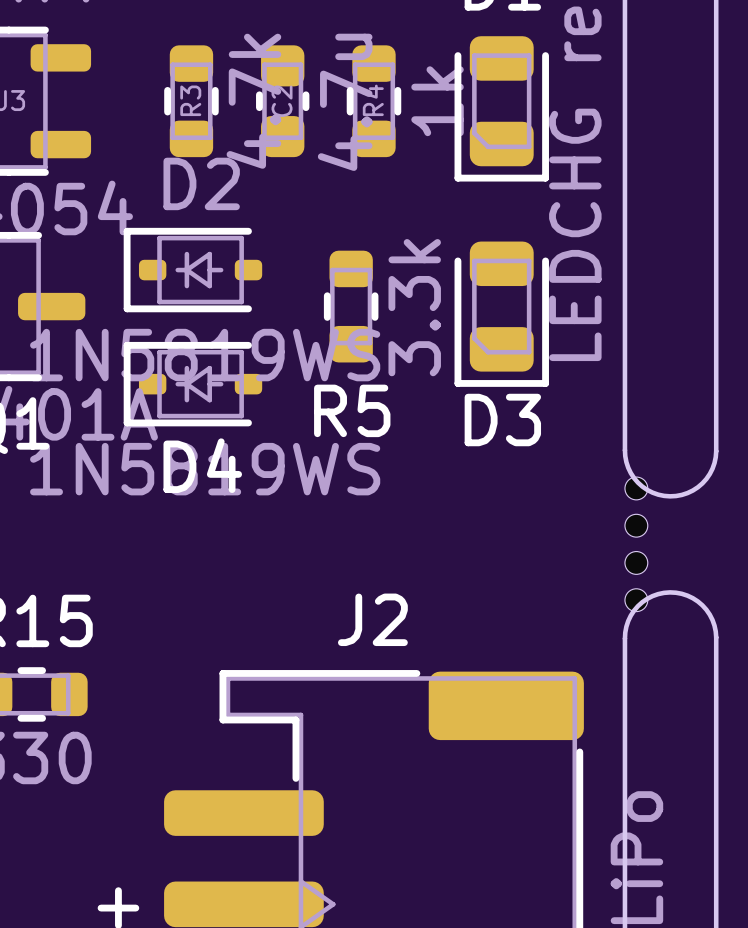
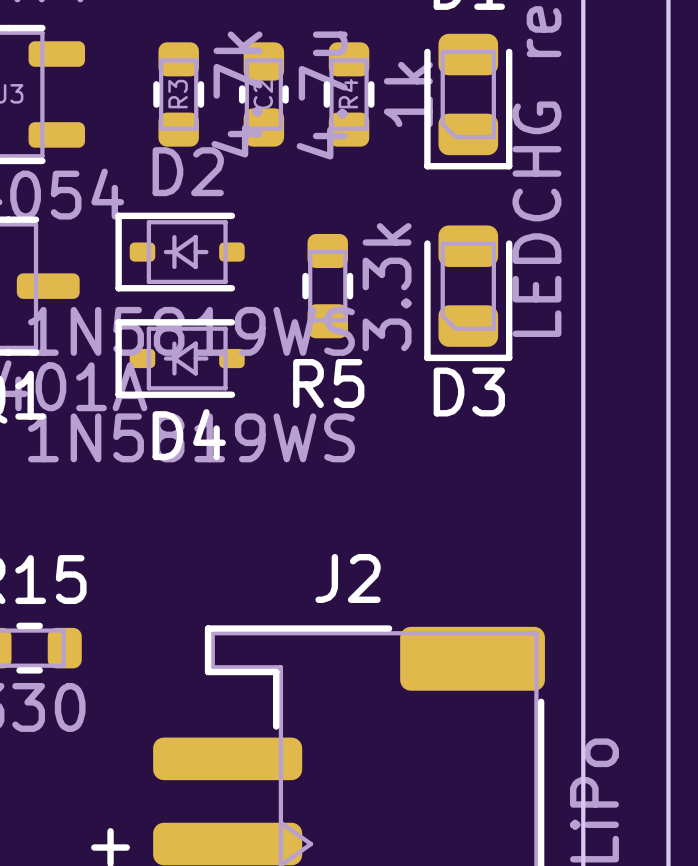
board edge: (624, 450) (628, 467) (637, 482) (652, 492) (670, 496) (687, 493) (702, 483) (712, 468) (716, 451) -> (668, 594) (668, 421)
part: (636, 488) -> none
part: (636, 525) -> none
part: (636, 562) -> none
part: (636, 600) -> none
board edge: (716, 637) (712, 620) (702, 605) (687, 595) (670, 592) (652, 596) (637, 606) (628, 621) (624, 638) -> (583, 420) (583, 596)

